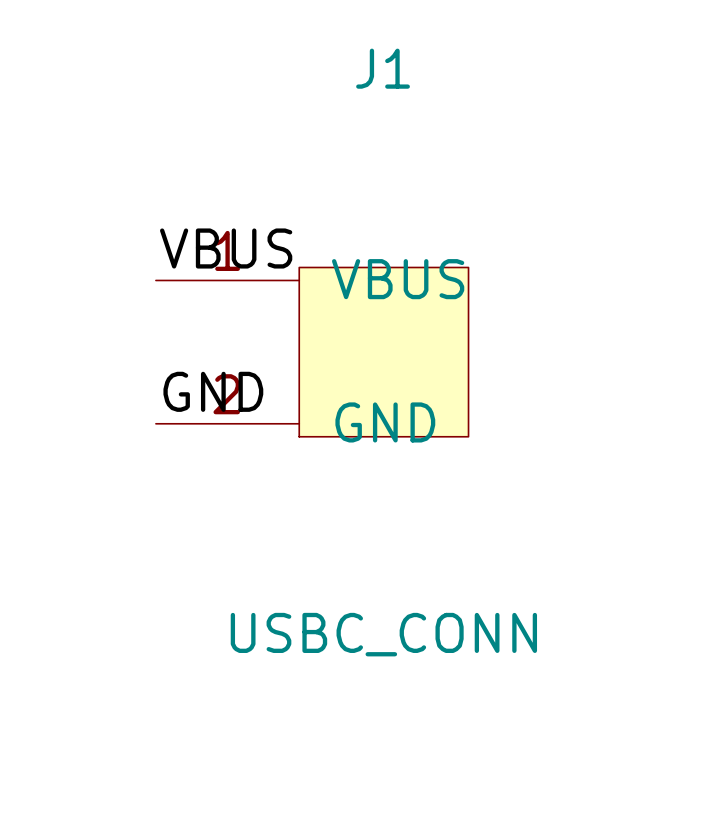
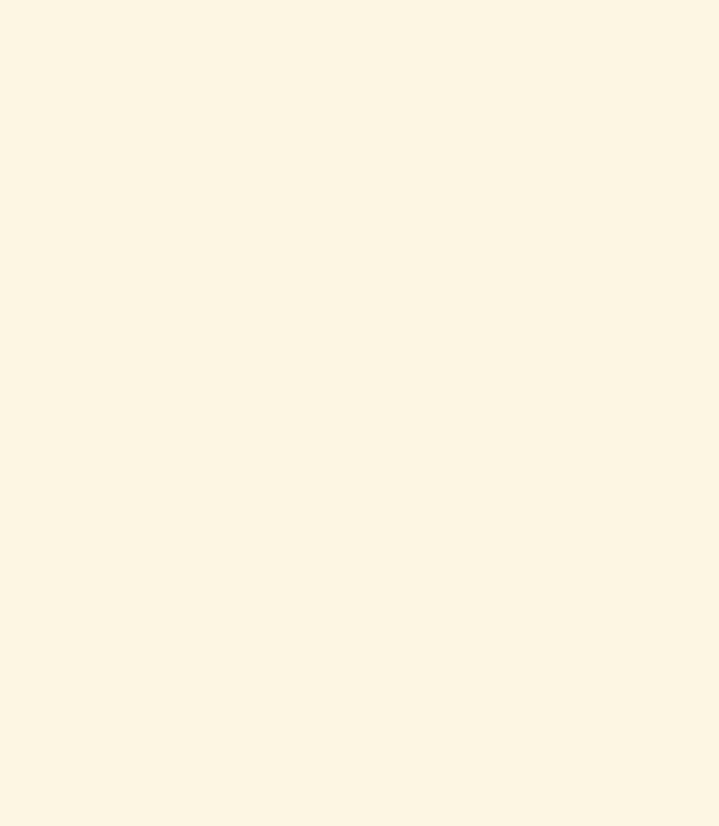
label: VBUS (226, 248) -> none
J1: USBC_CONN (312, 352) -> none
label: GND (213, 391) -> none

